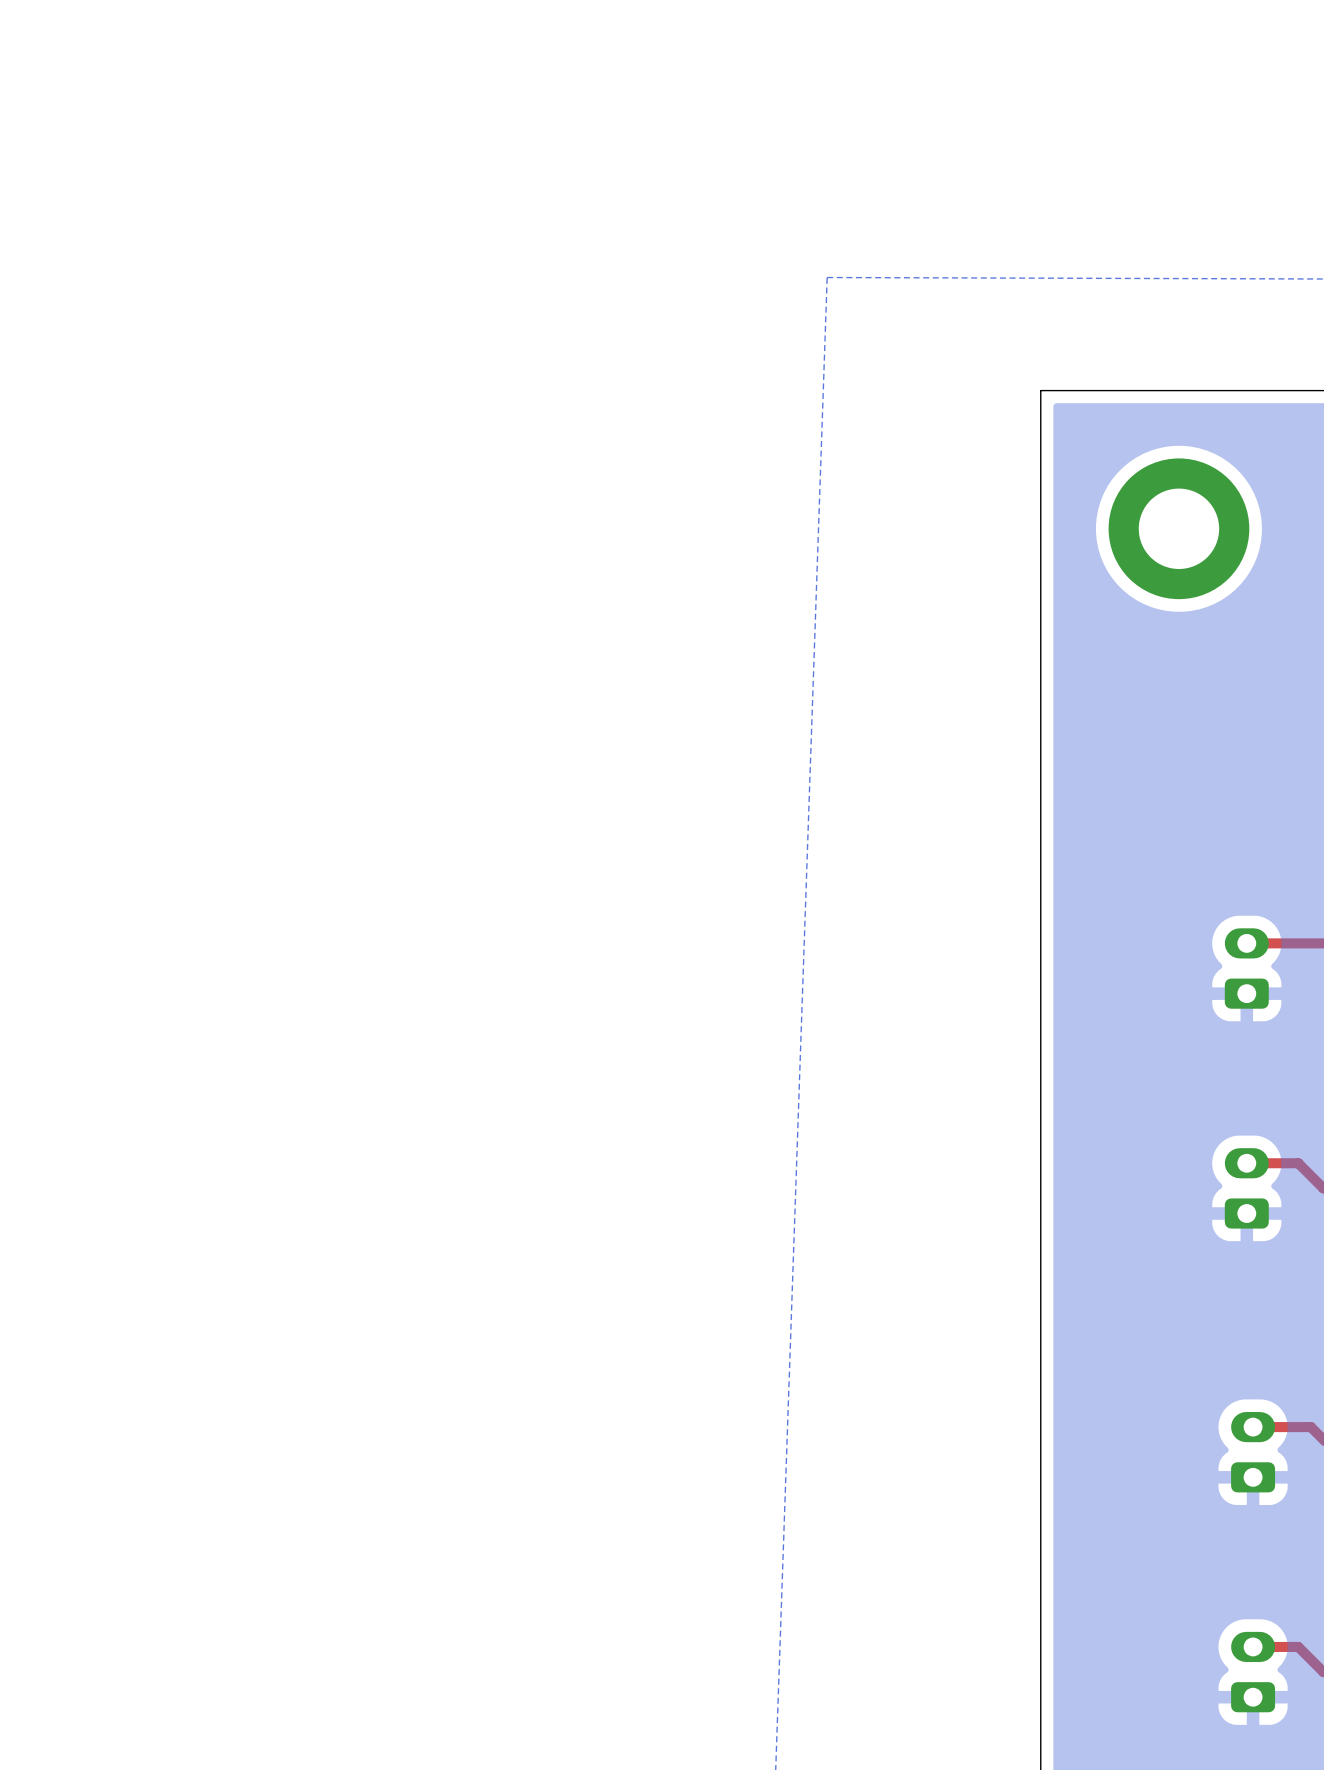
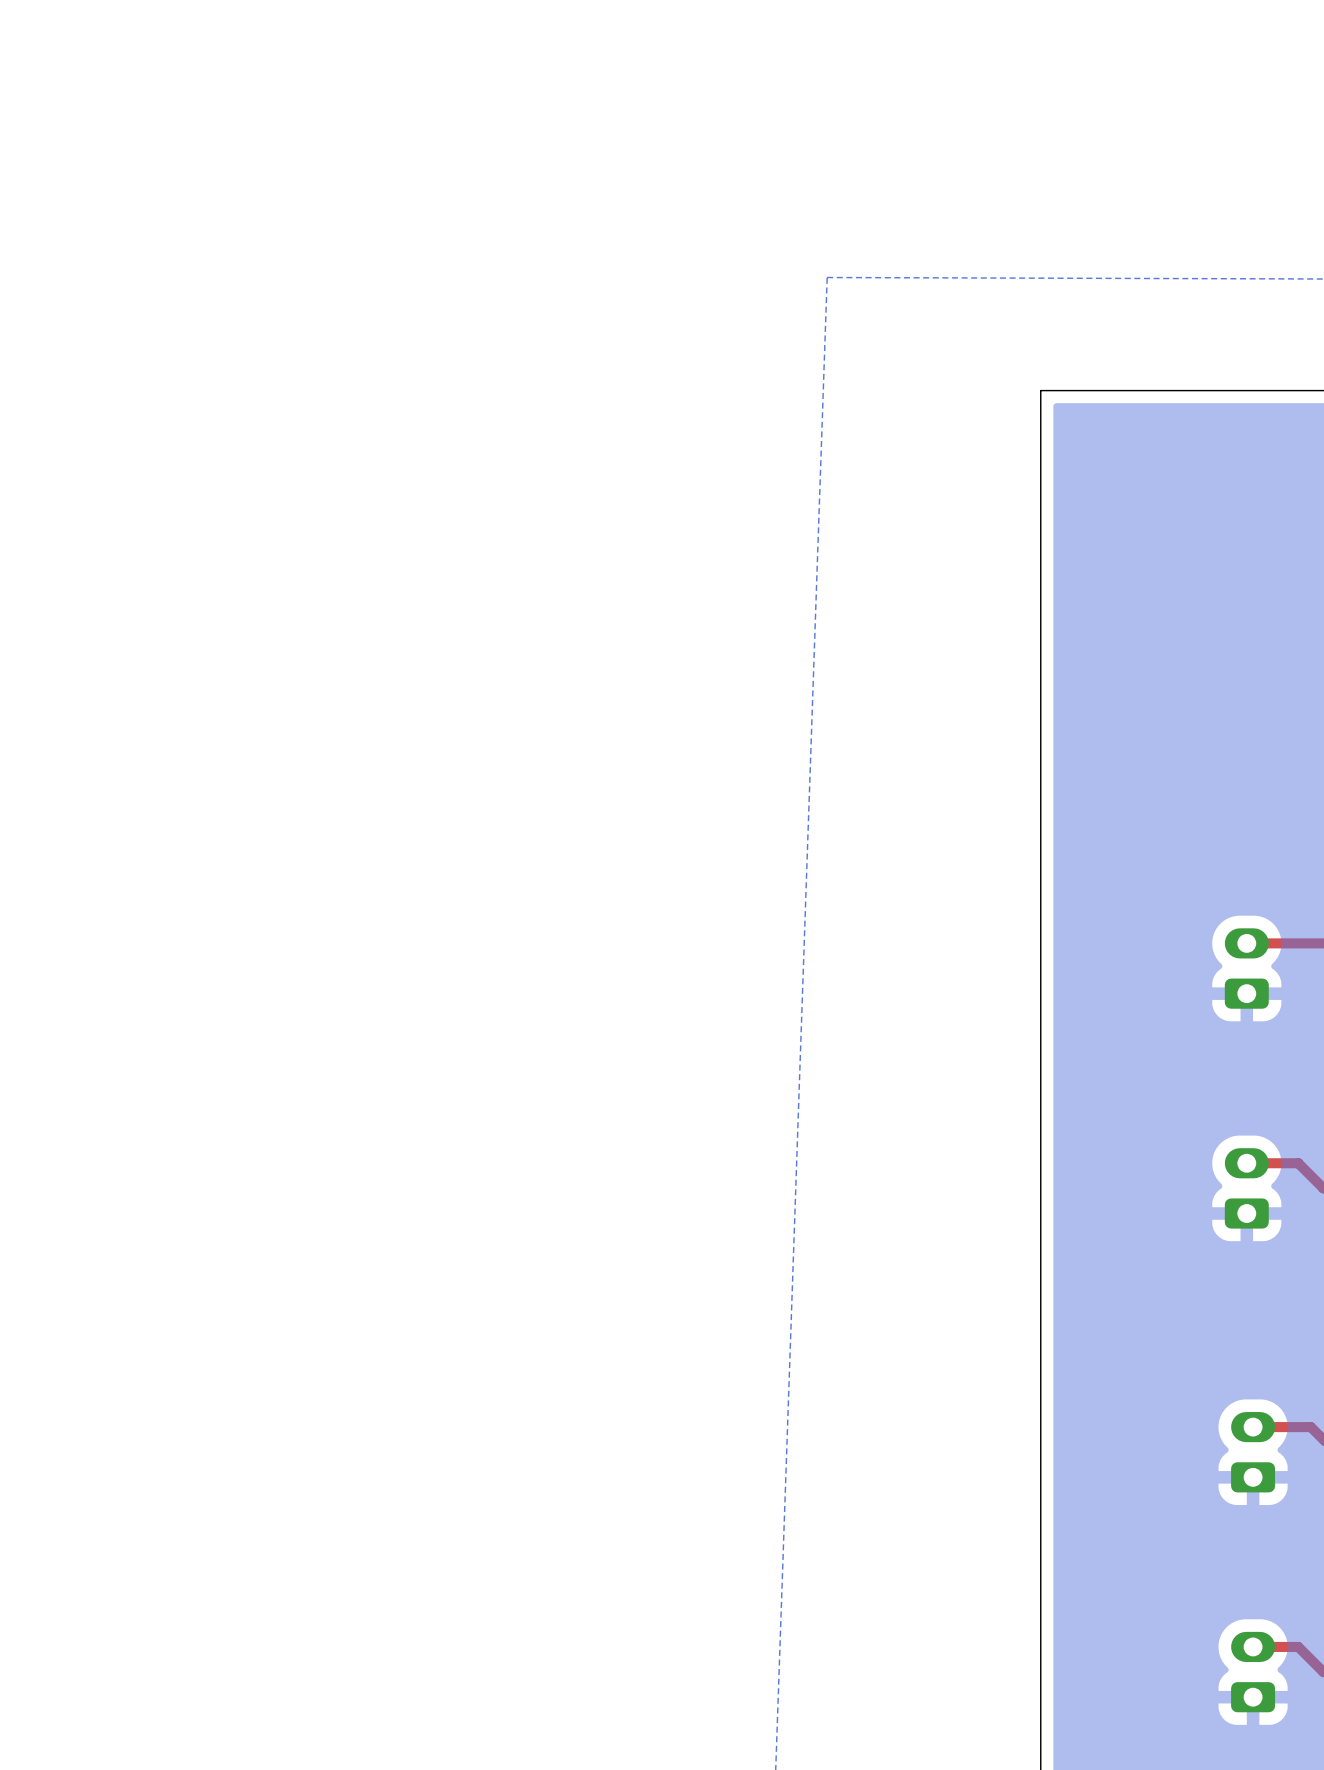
part: (1178, 528) -> none

